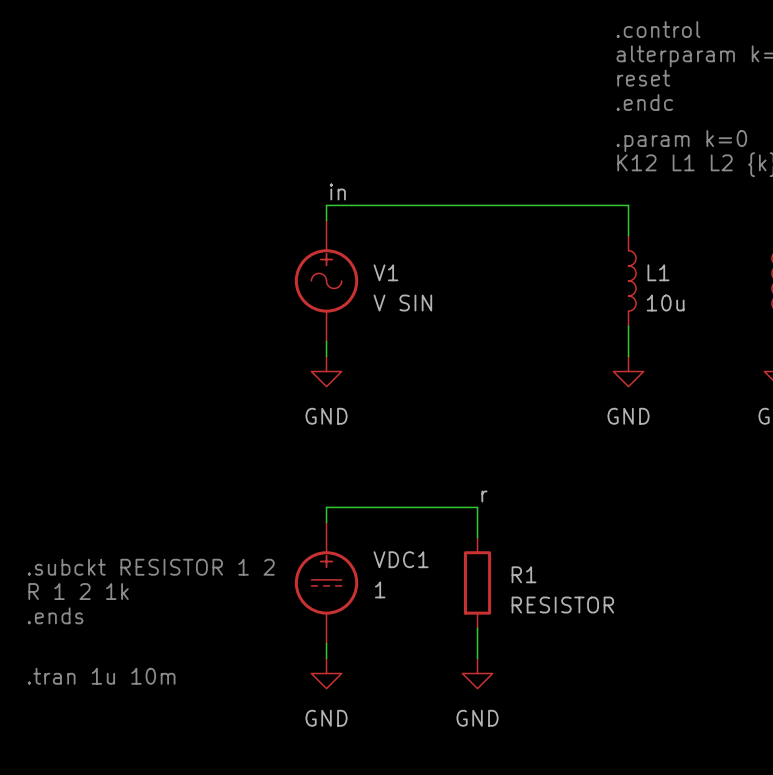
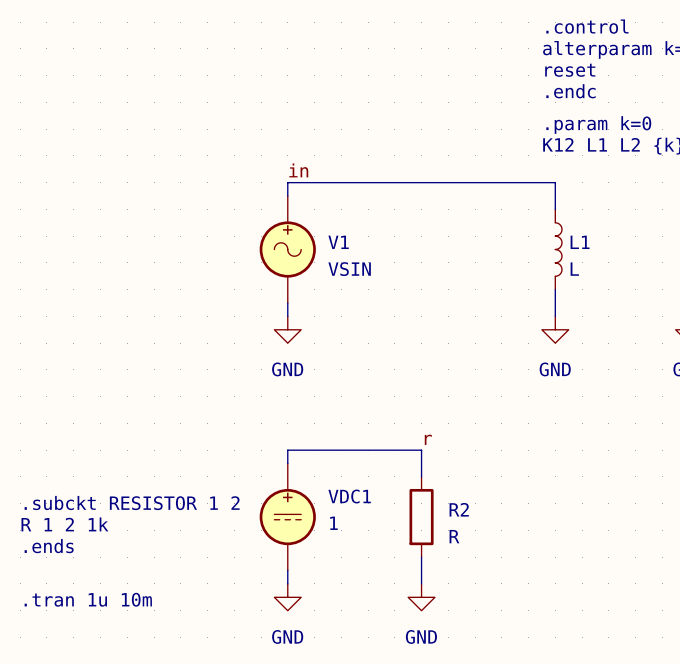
V1 value: V SIN (402, 303) -> VSIN (349, 269)
L1 value: 10u (665, 303) -> L (574, 269)
R1 name: R1 (524, 574) -> R2 (459, 509)
R1 value: RESISTOR (562, 605) -> R (454, 536)

